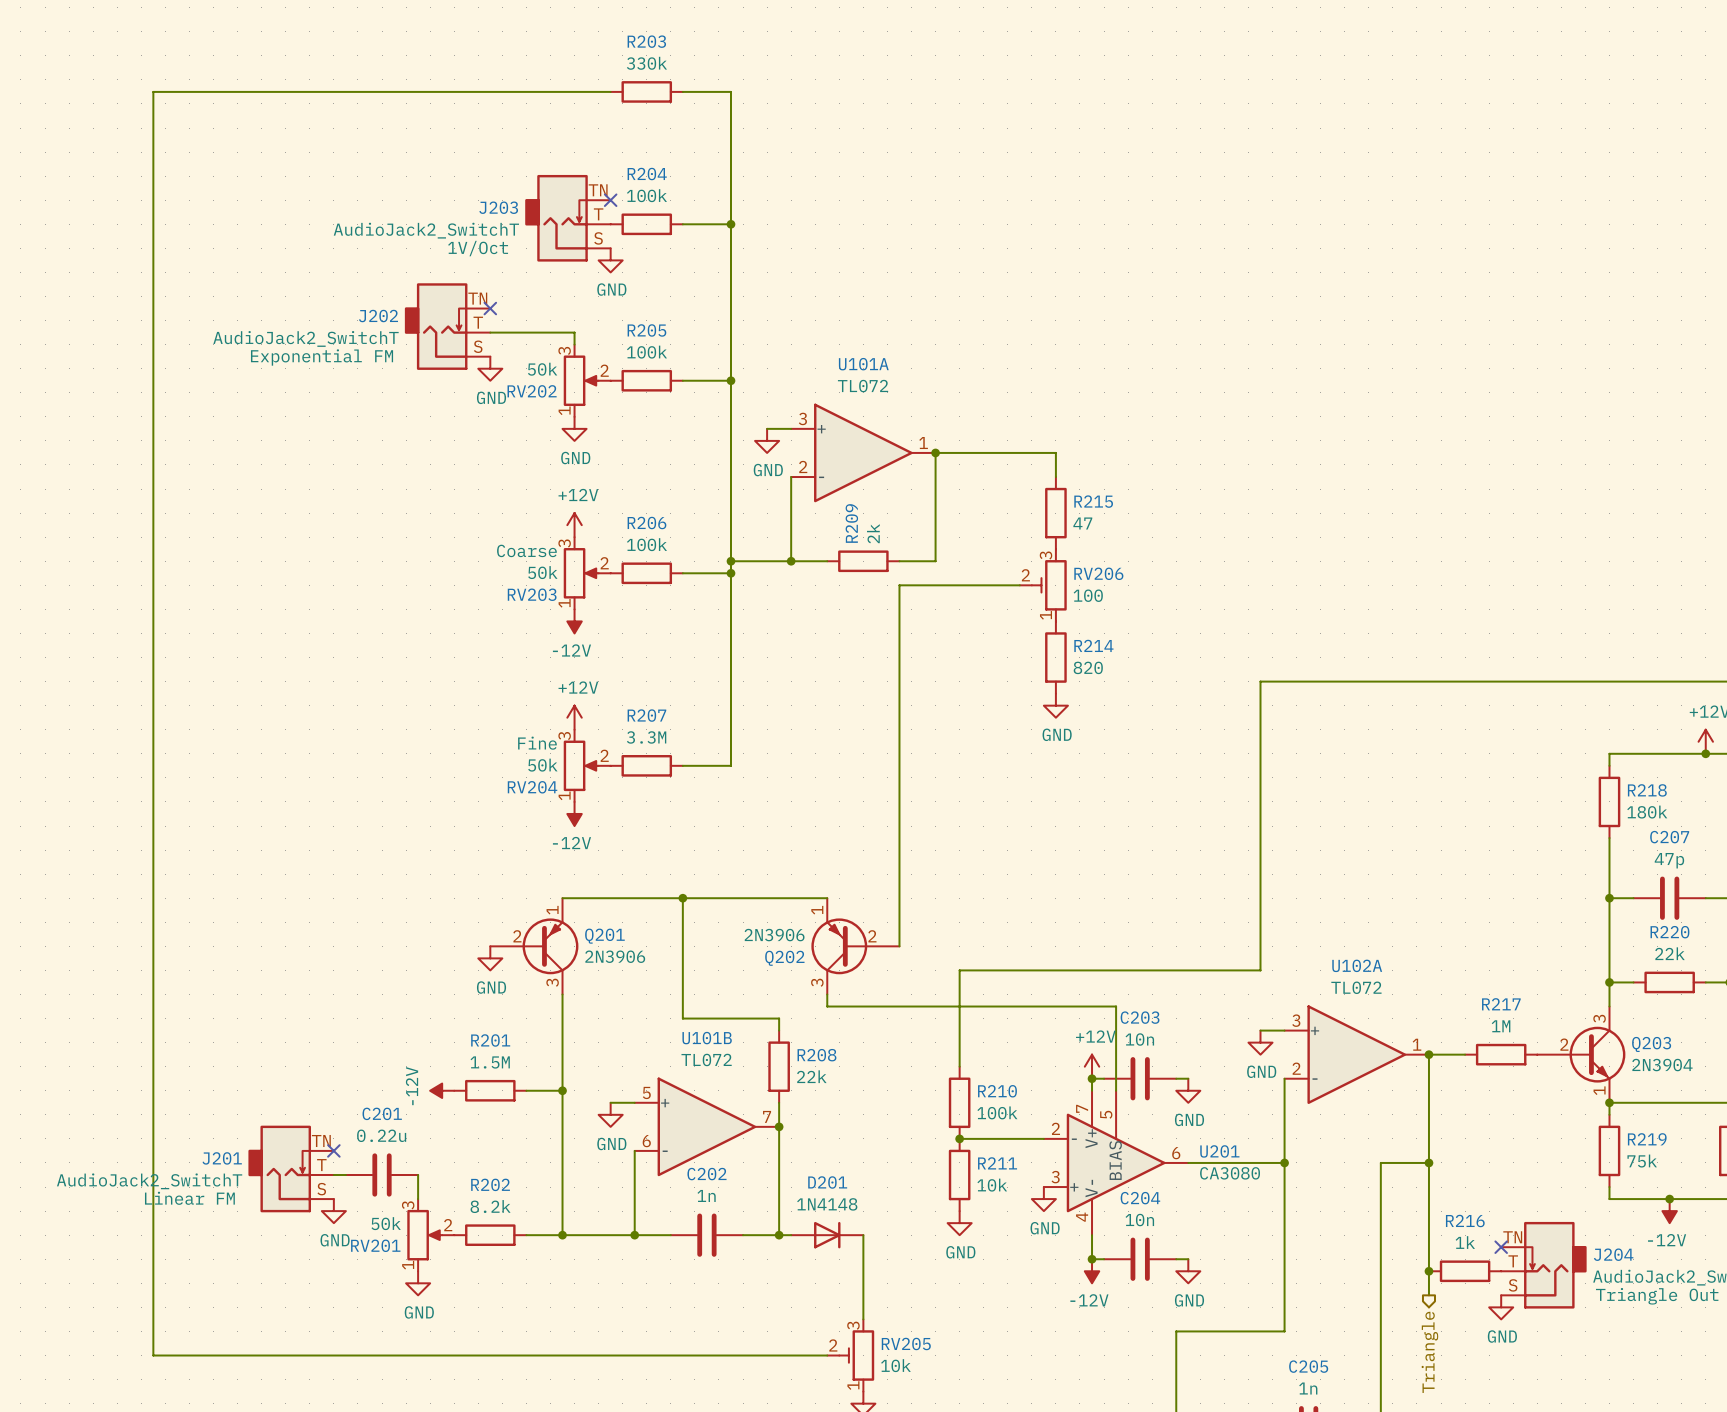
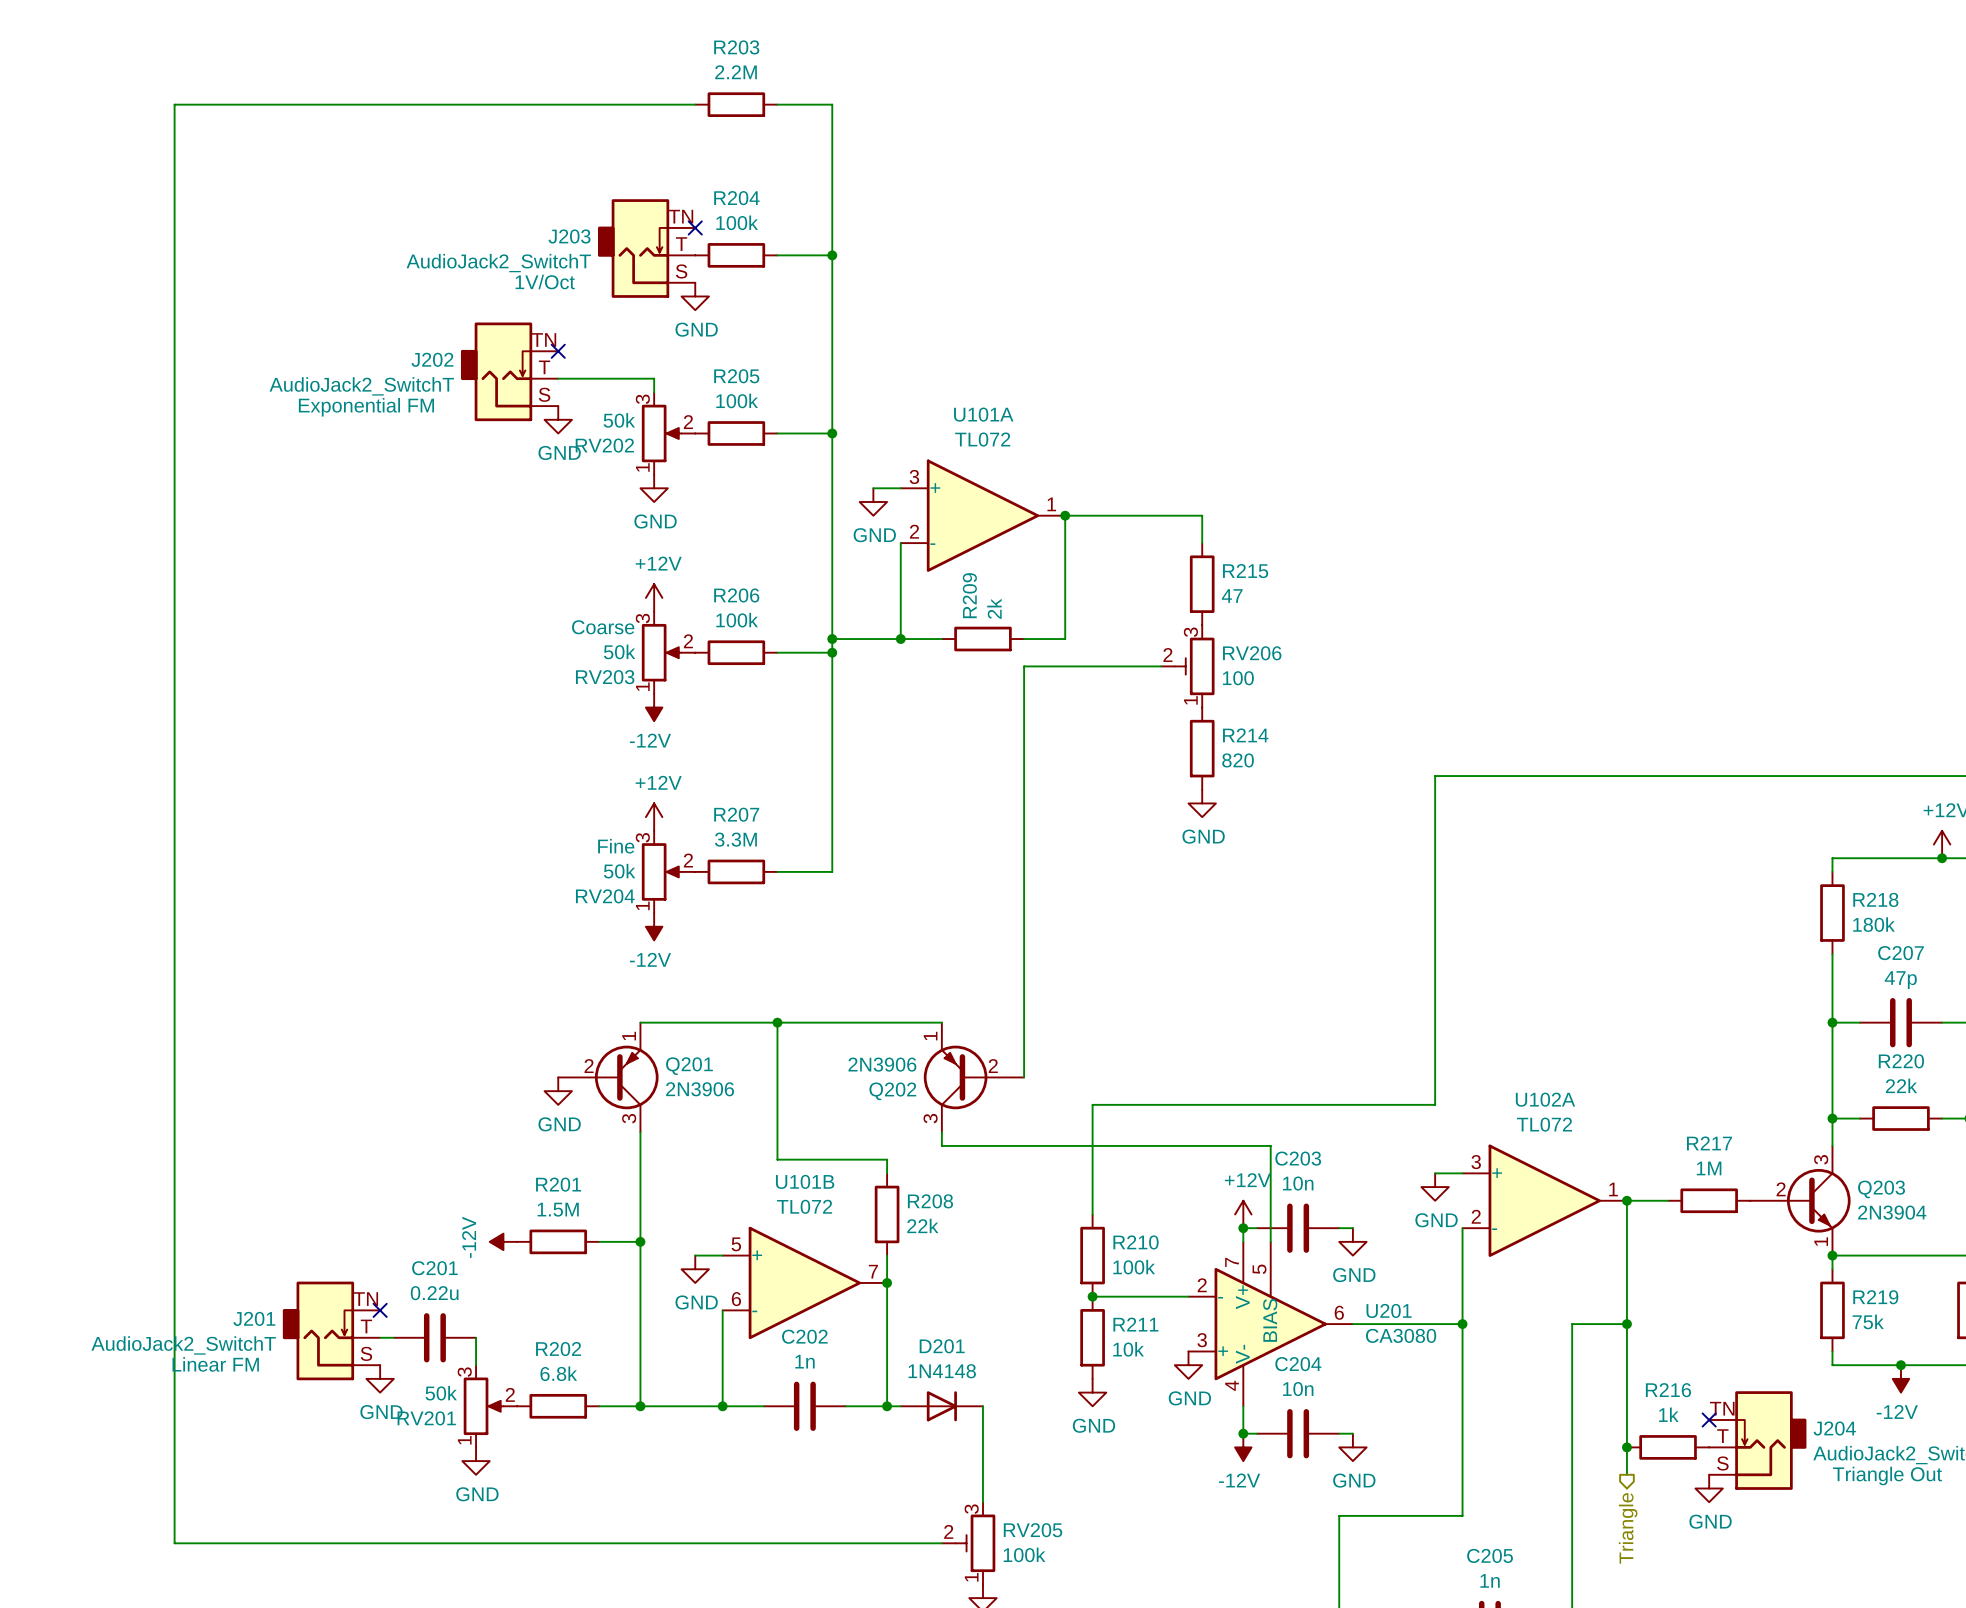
R203 value: 330k (646, 63) -> 2.2M (736, 72)
R202 value: 8.2k (490, 1206) -> 6.8k (558, 1373)
RV205 value: 10k (895, 1365) -> 100k (1024, 1554)

